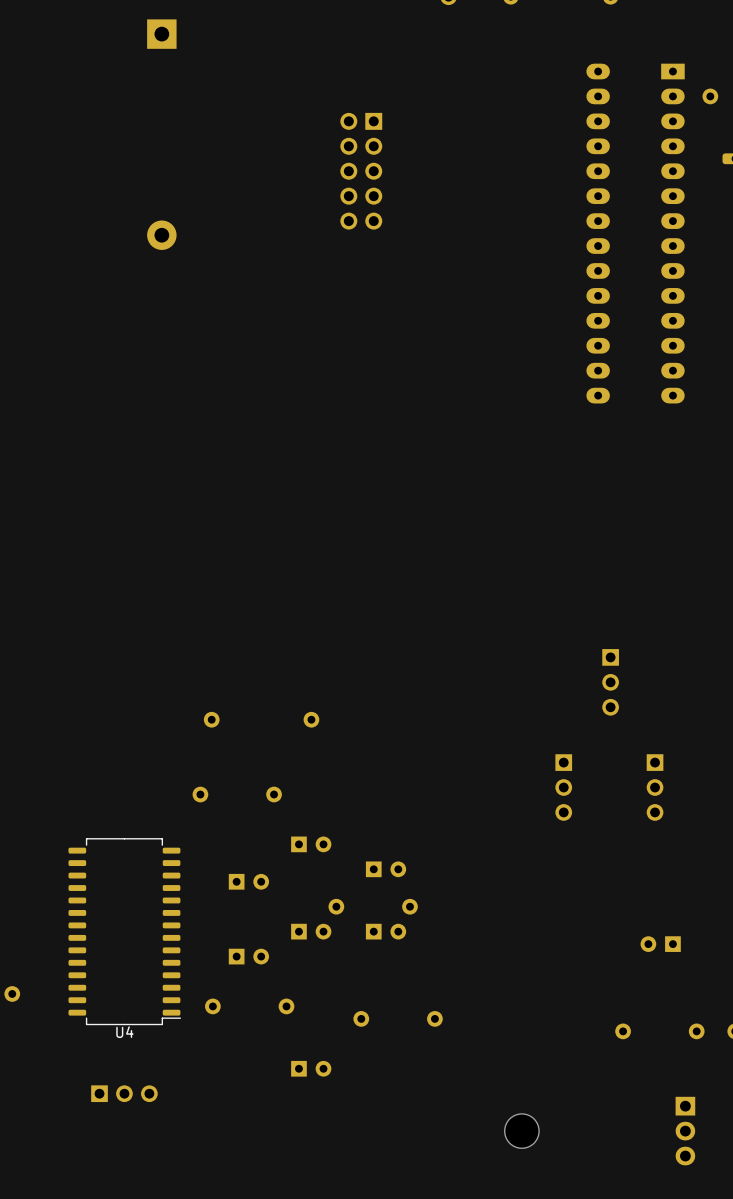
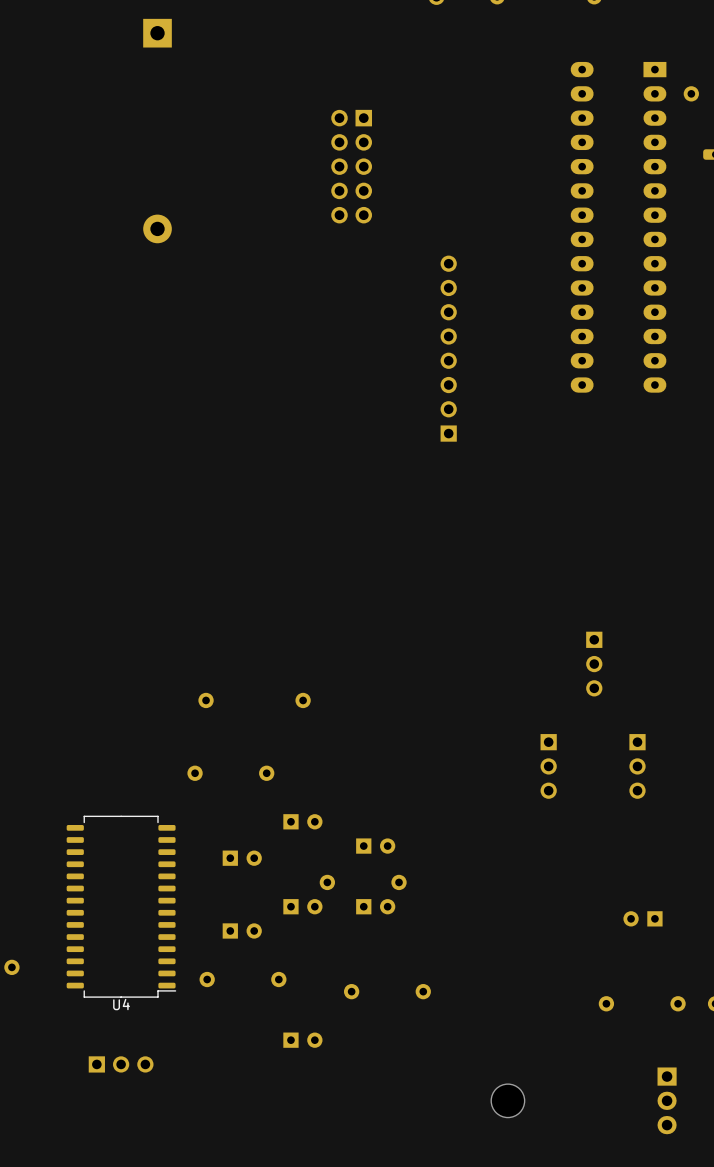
part: none -> (448, 348)

